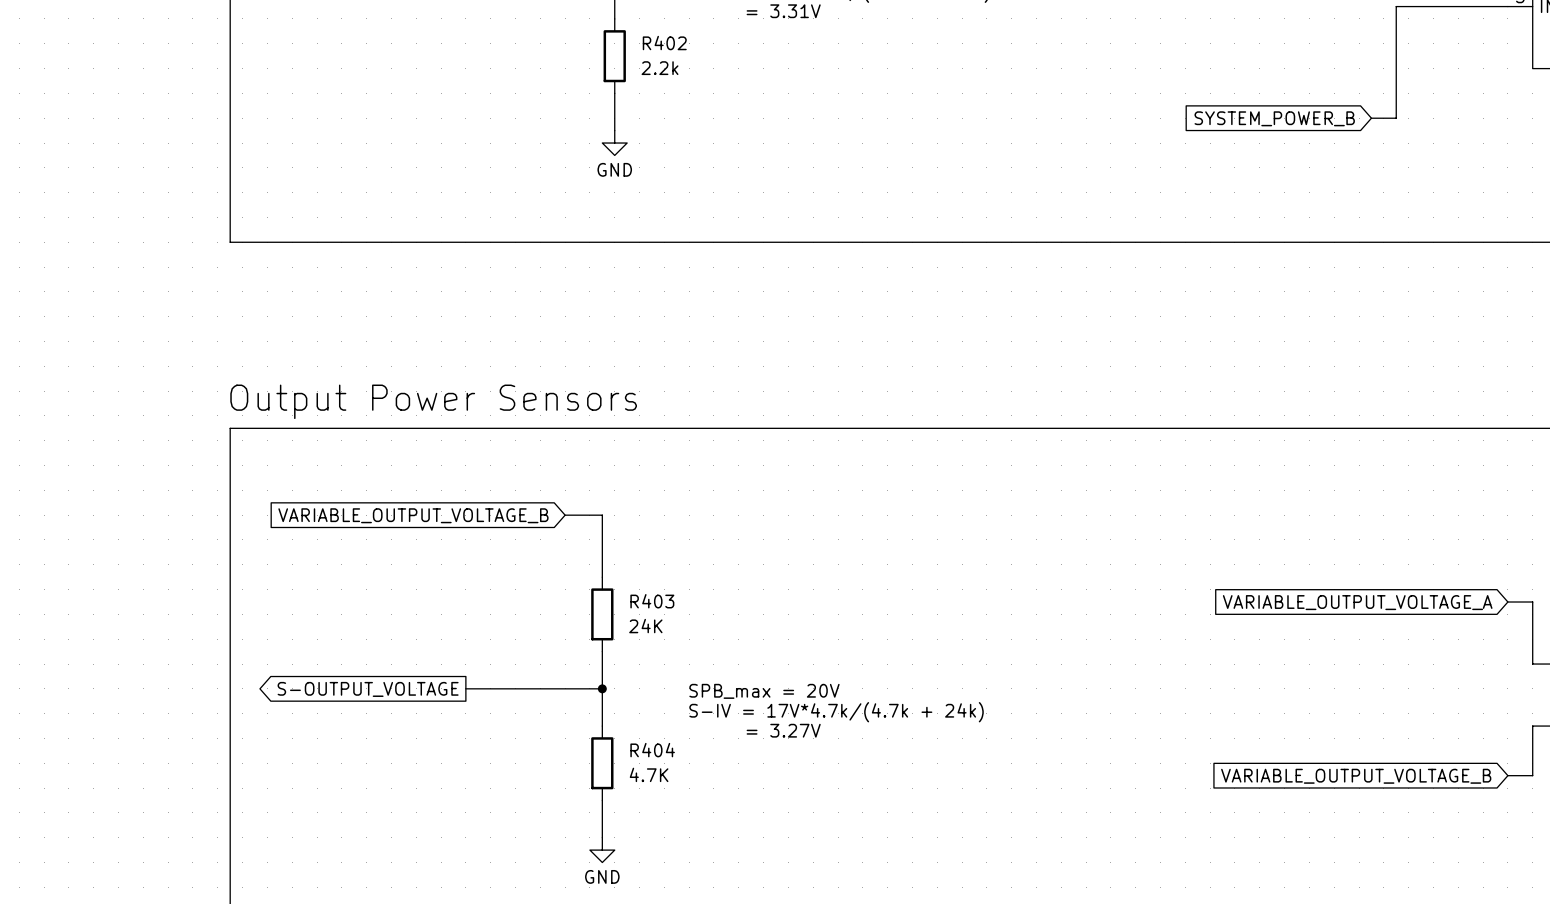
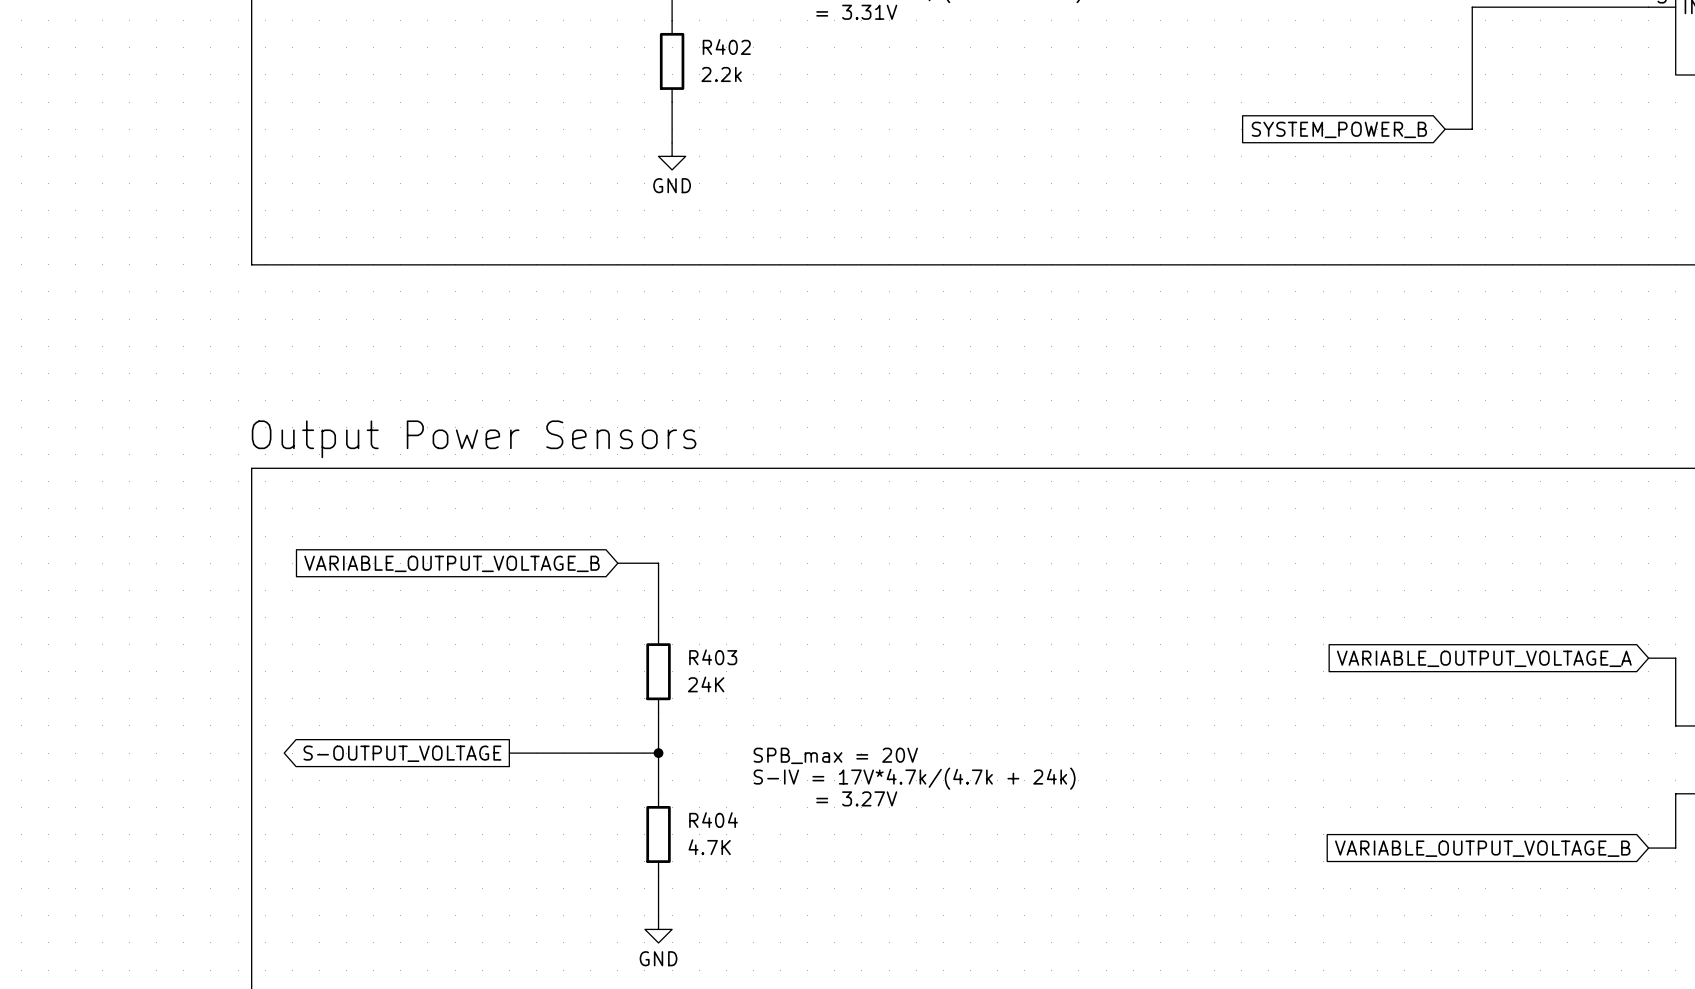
wire: (1396, 6) (1396, 118) (1371, 118) -> (1526, 7) (1472, 7) (1472, 129) (1445, 129)
global label position: SYSTEM_POWER_B (1274, 118) -> SYSTEM_POWER_B (1339, 129)

